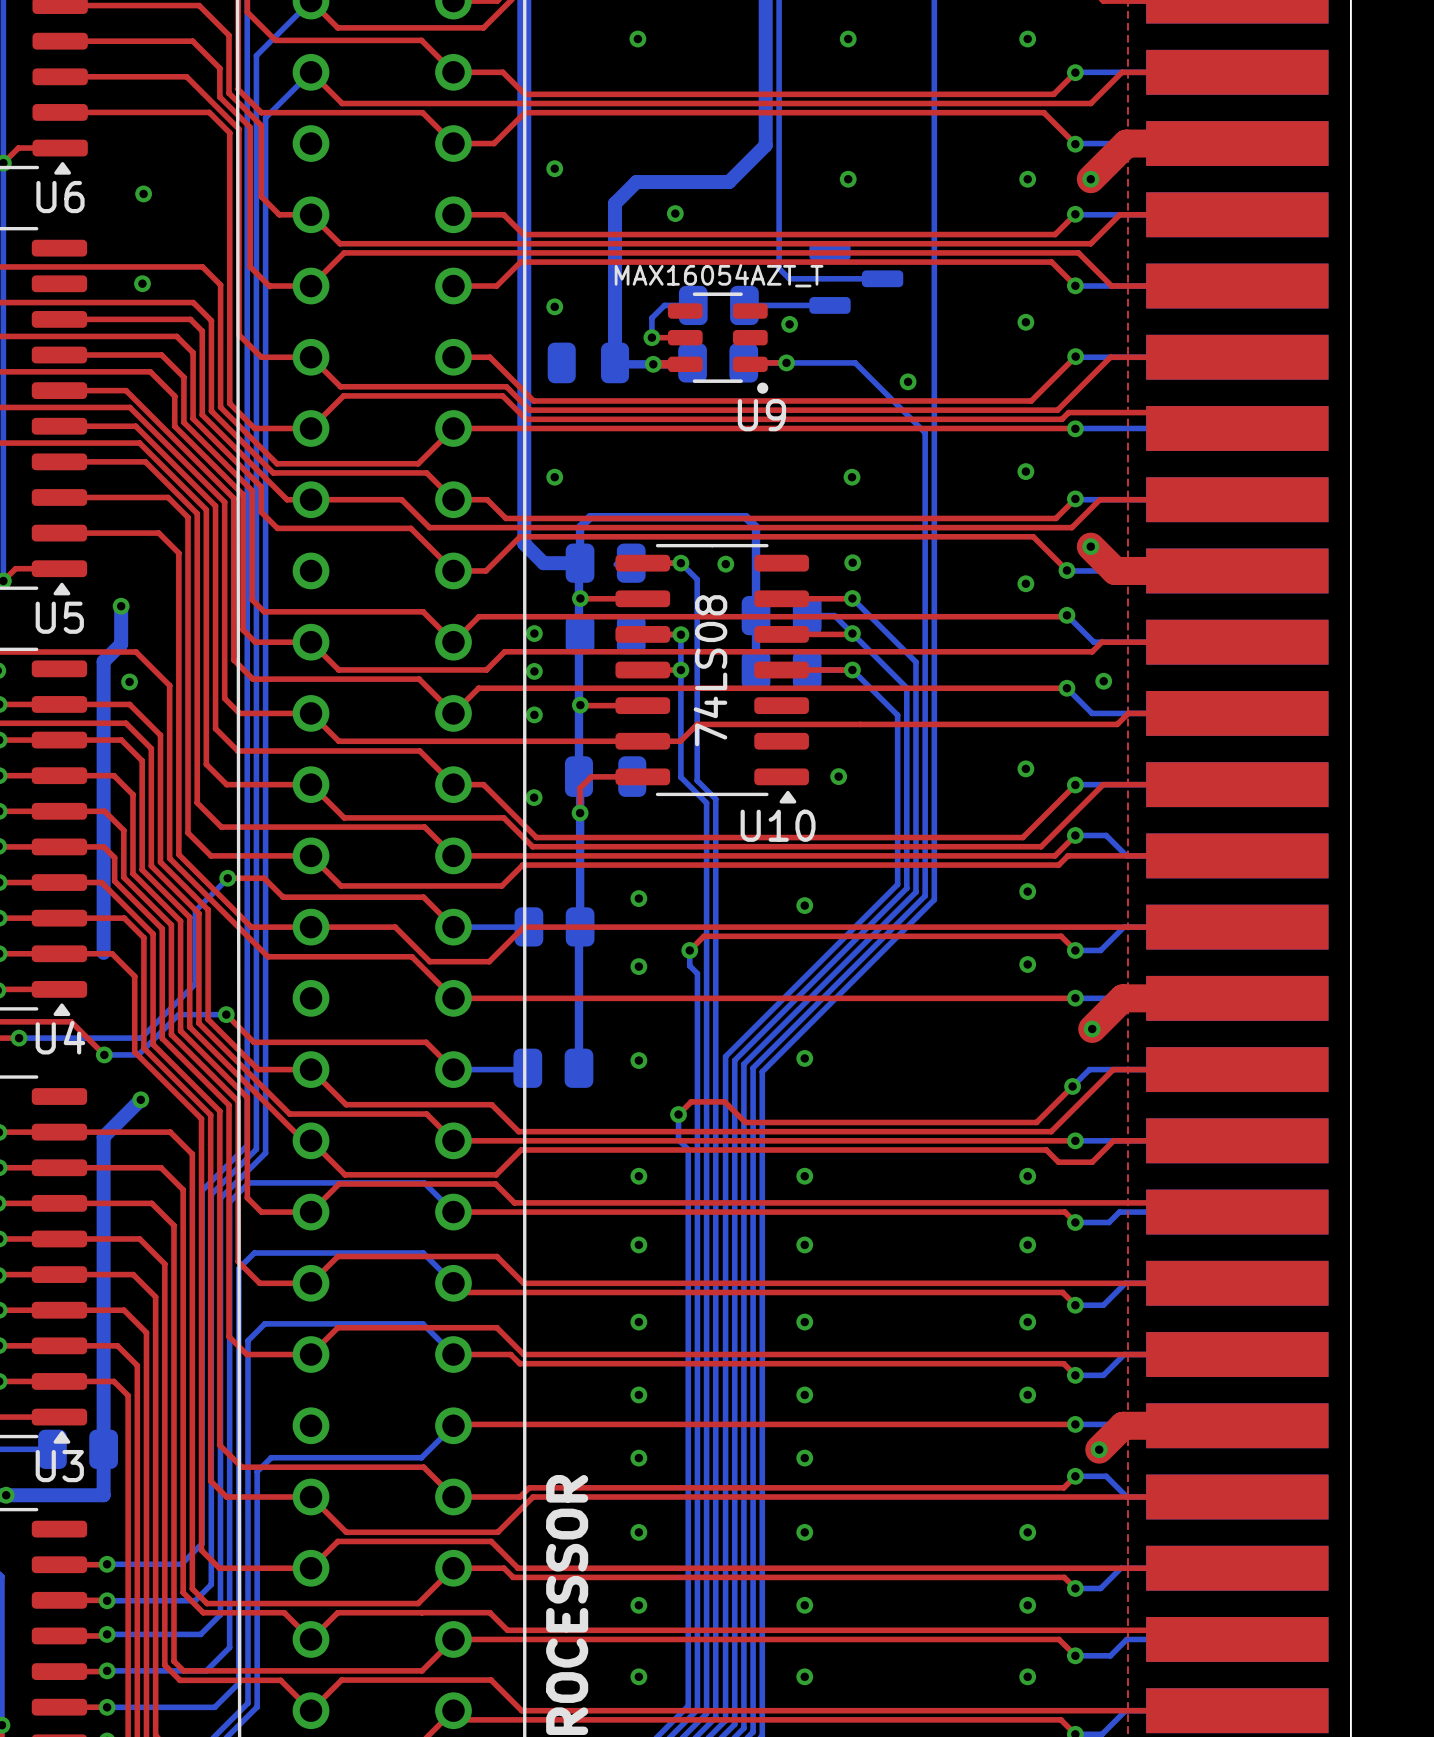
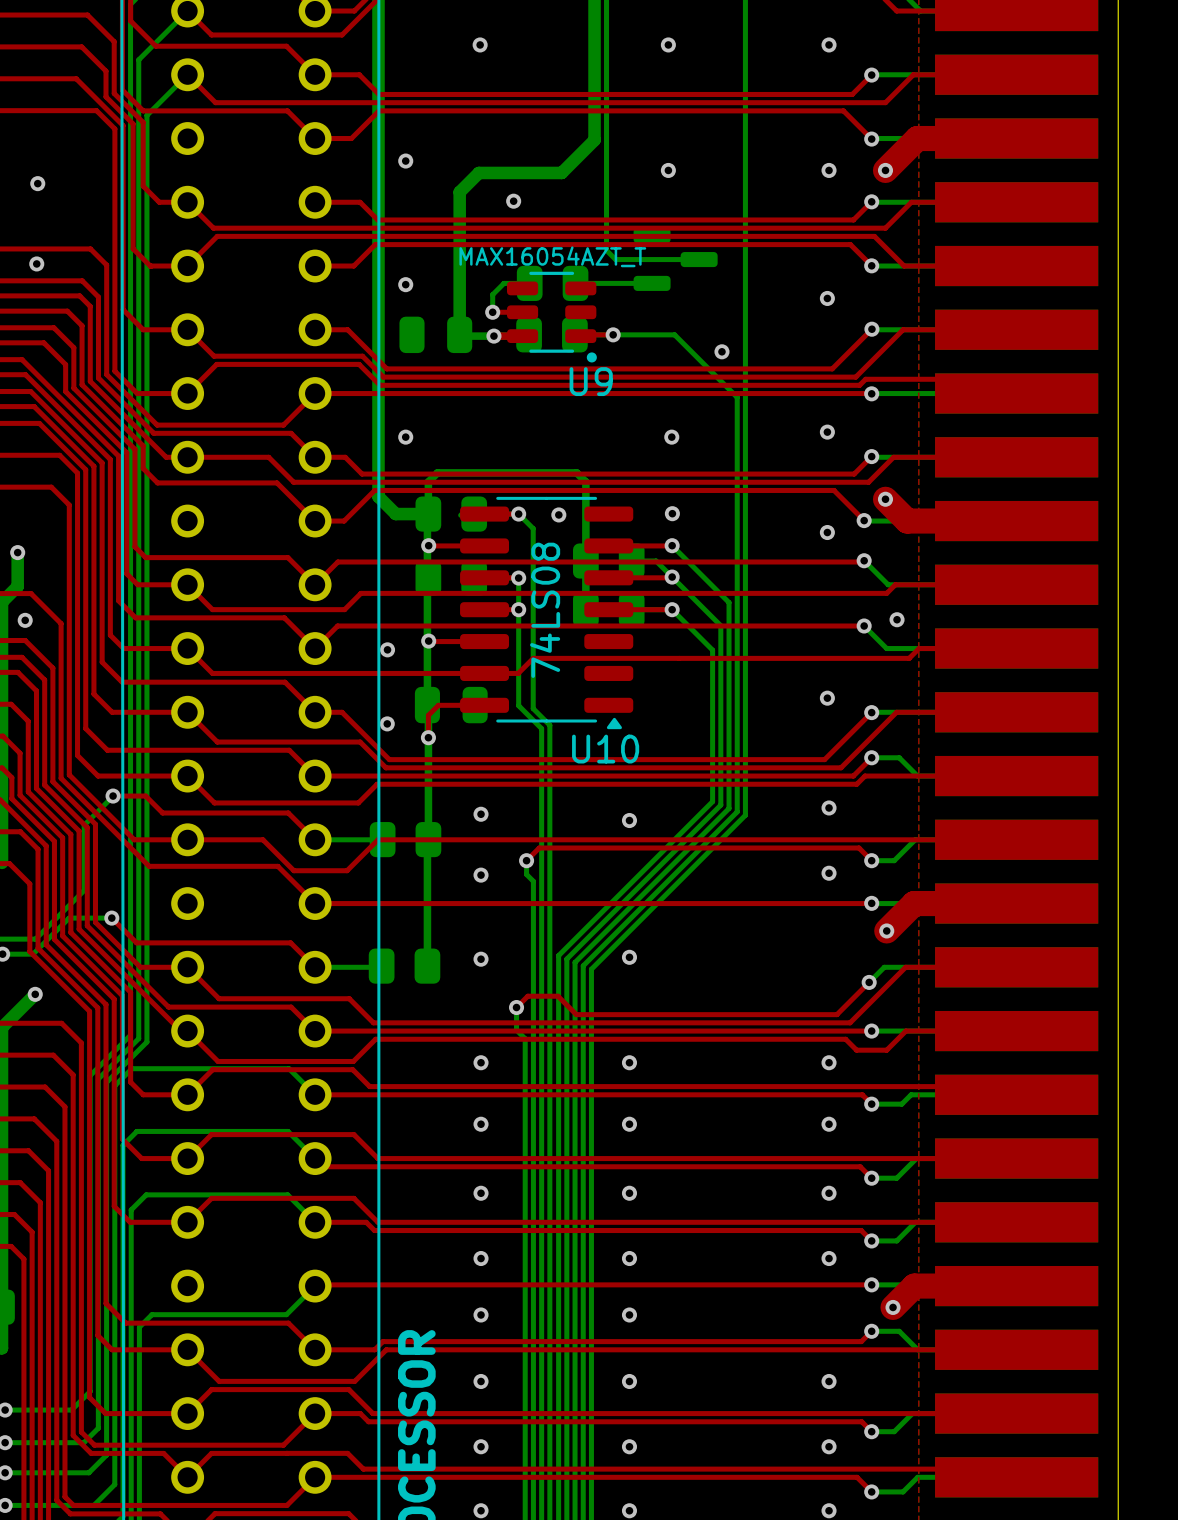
via: (789, 324) -> none
via: (534, 633) -> none
via: (534, 671) -> none
via: (838, 776) -> none

